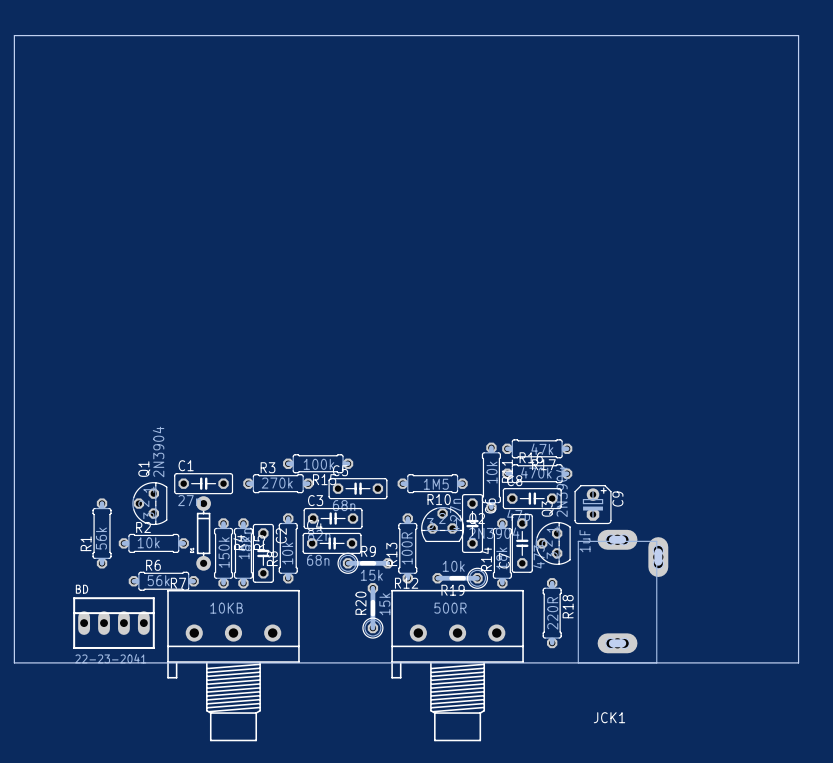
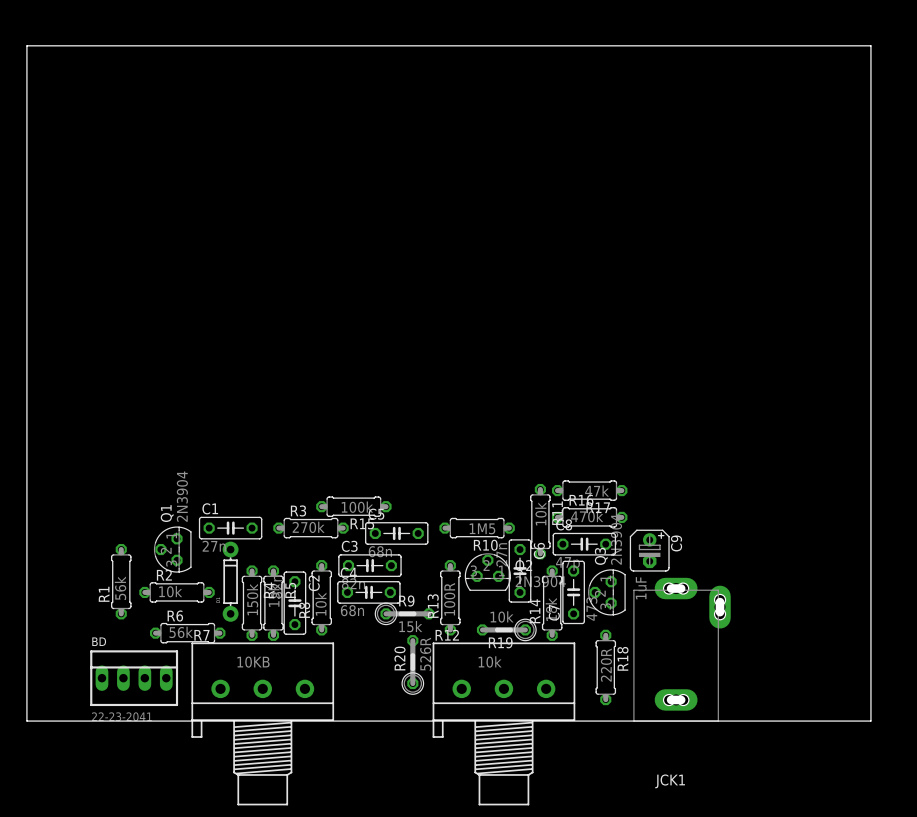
R20 value: 15k (384, 604) -> 526R (425, 654)
R12 value: 500R (450, 608) -> 10k (490, 661)

